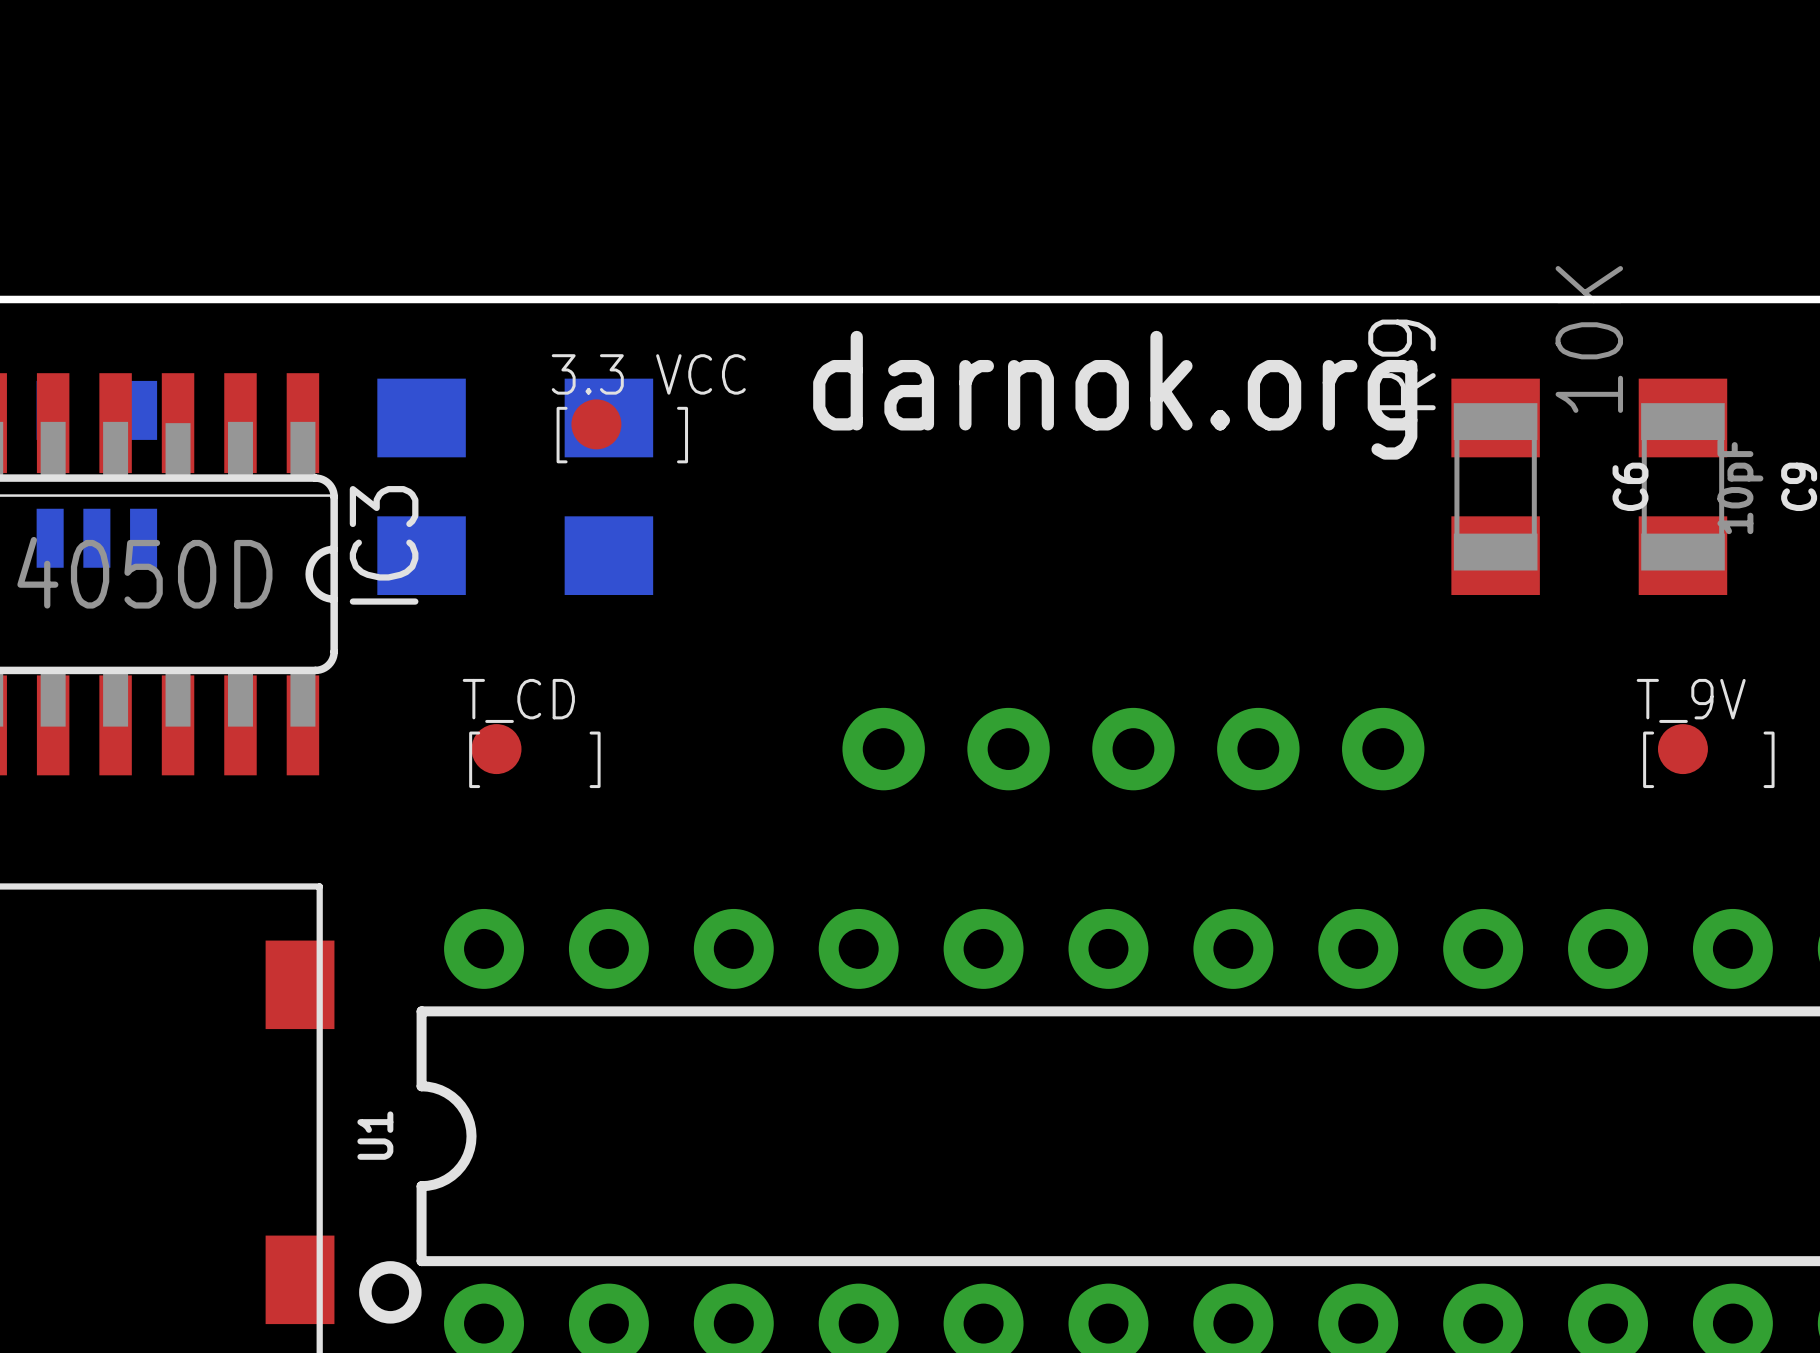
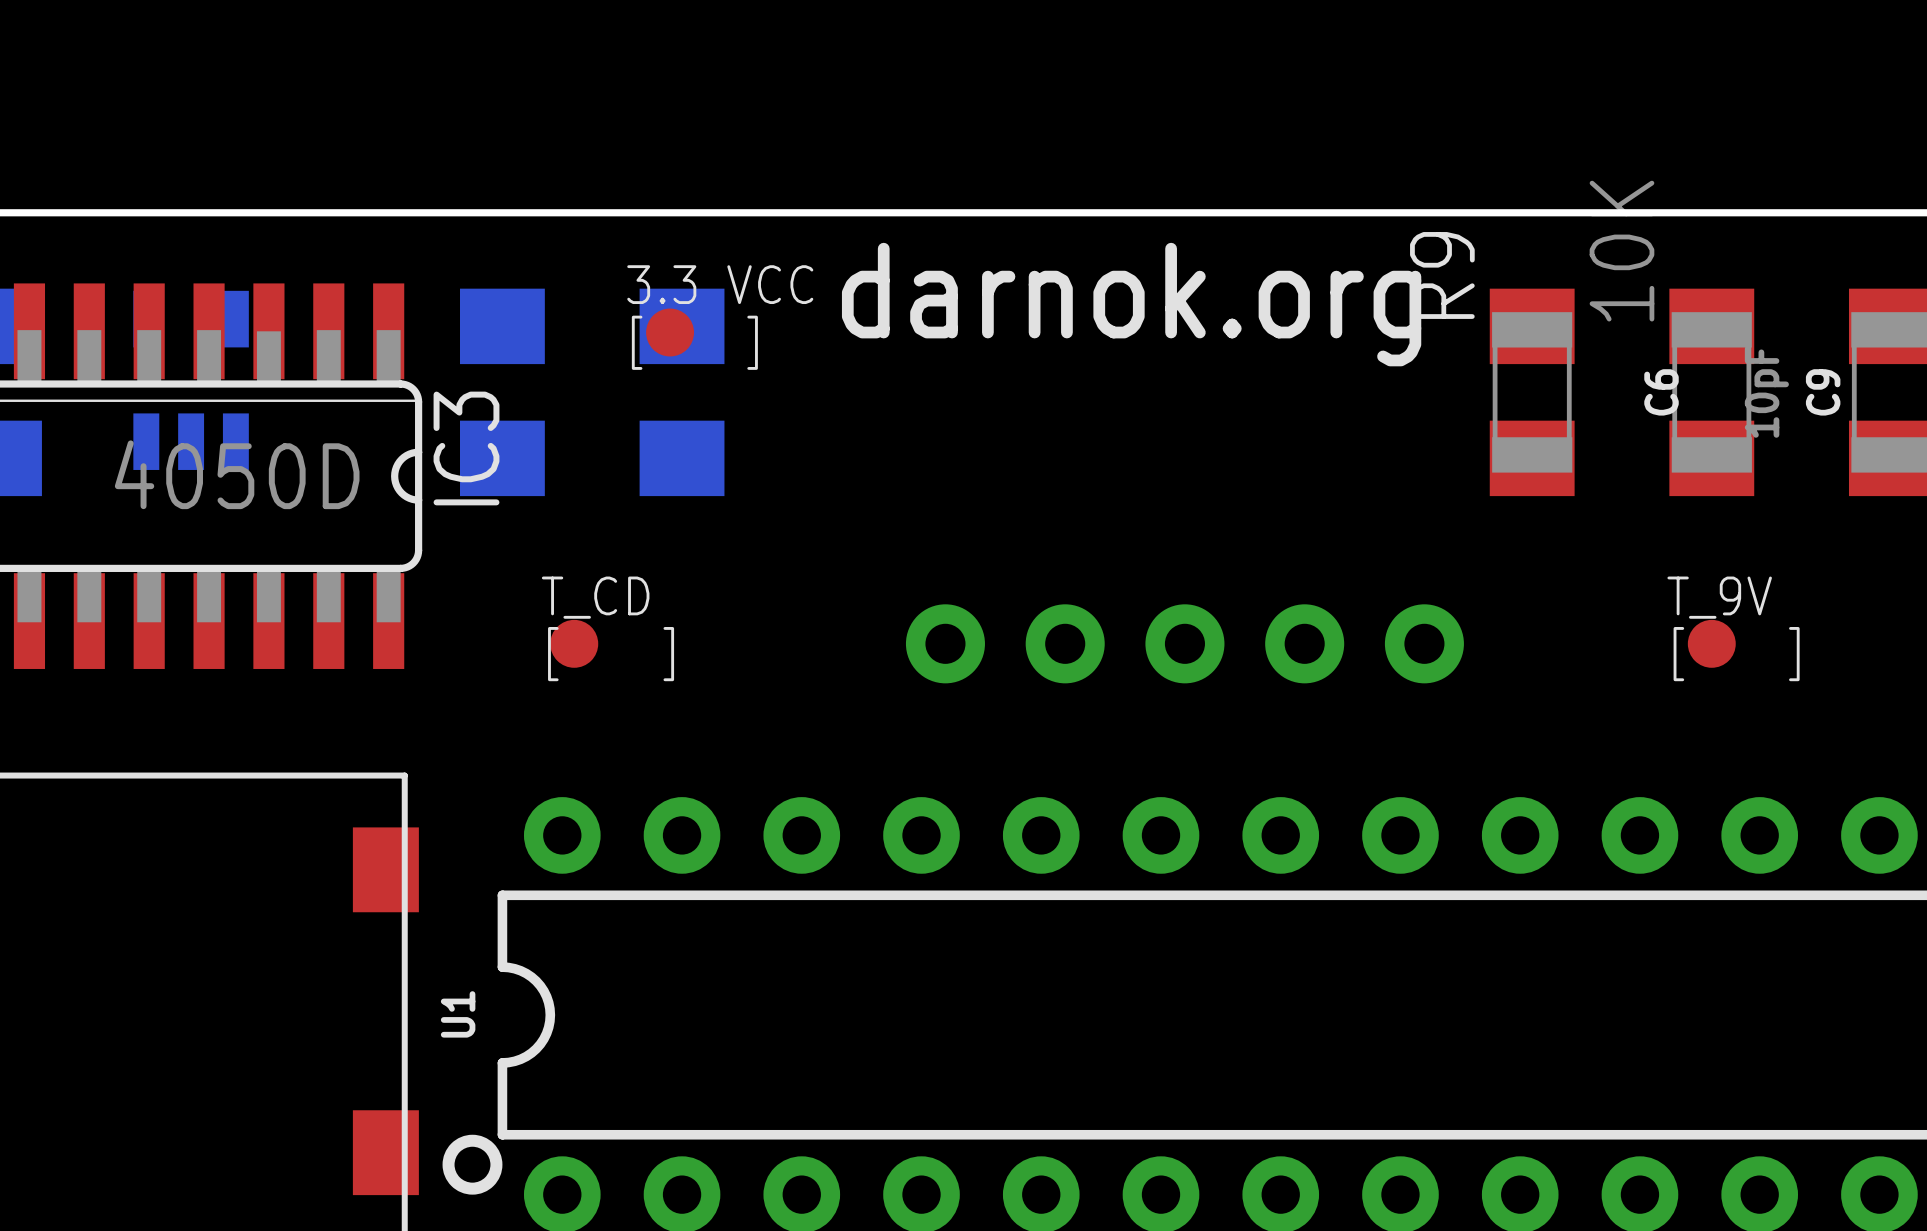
text position: darnok.org (1115, 395) -> darnok.org (1131, 304)

